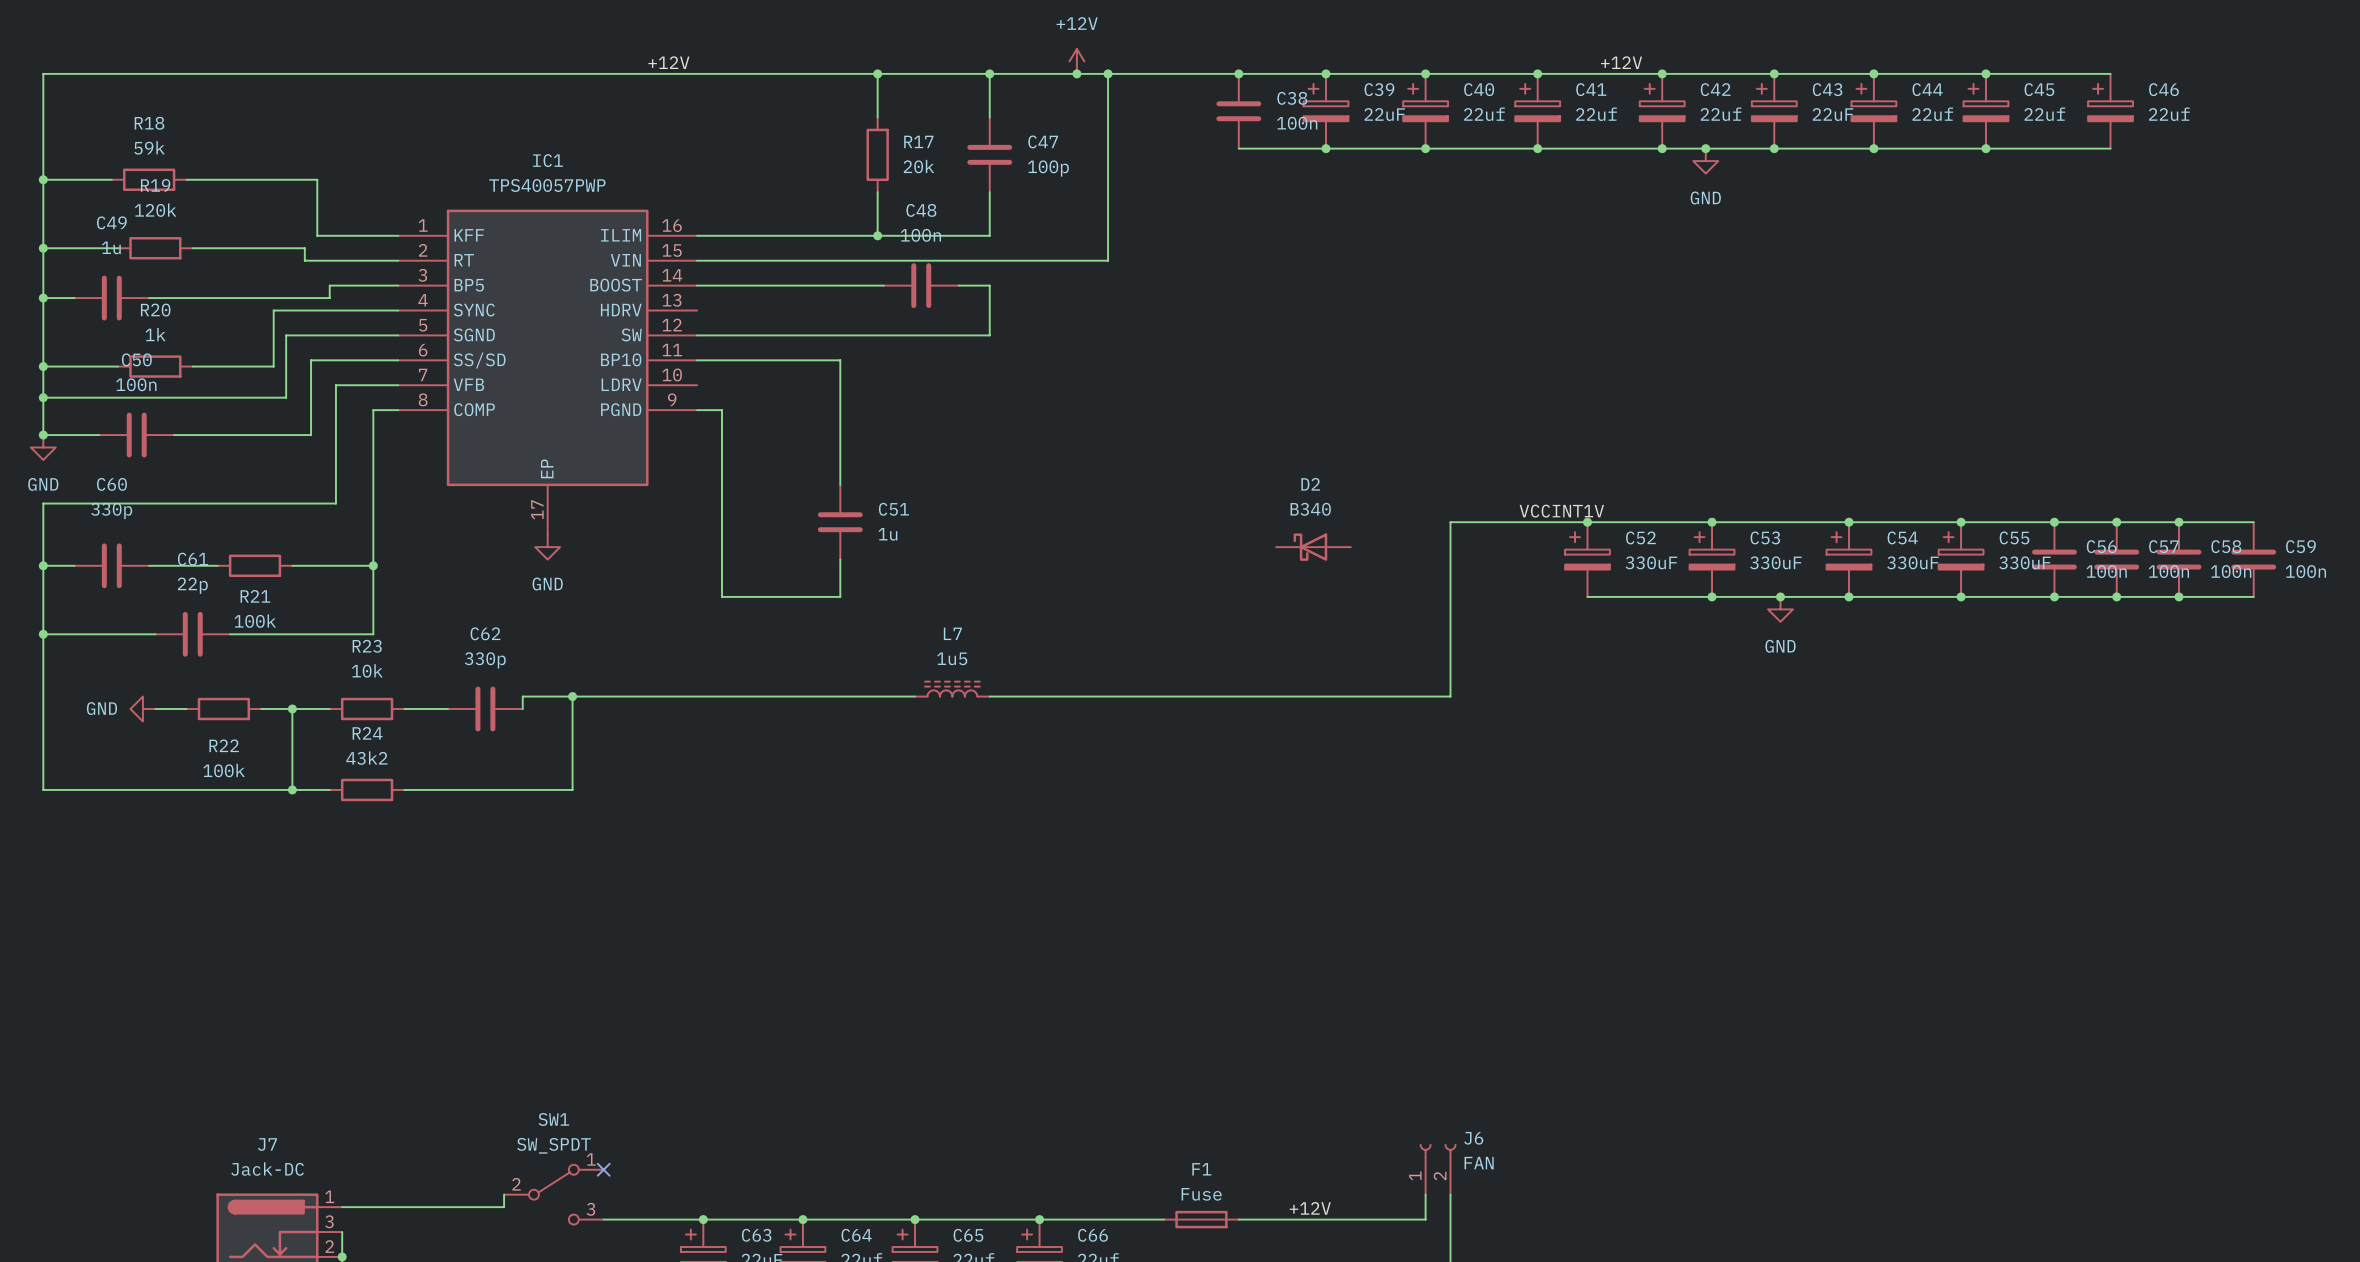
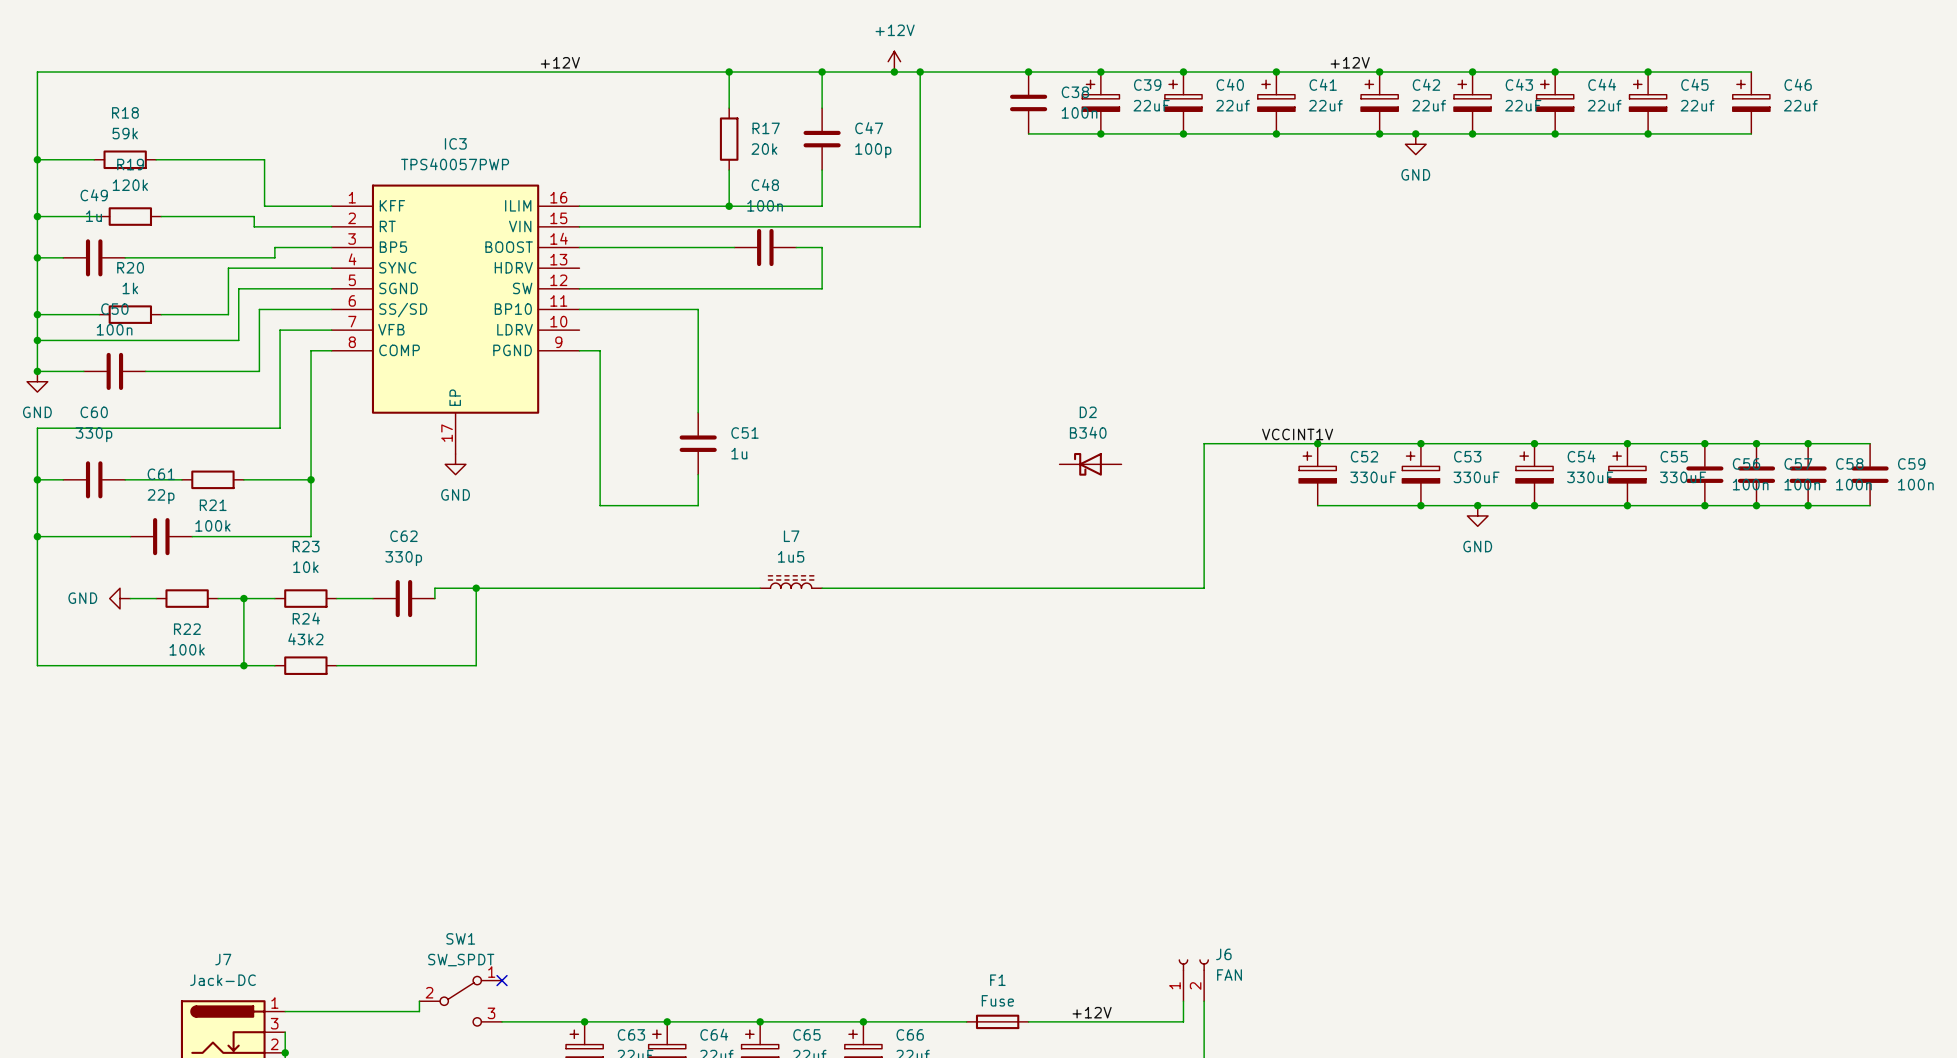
IC1 name: IC1 (547, 160) -> IC3 (455, 143)

